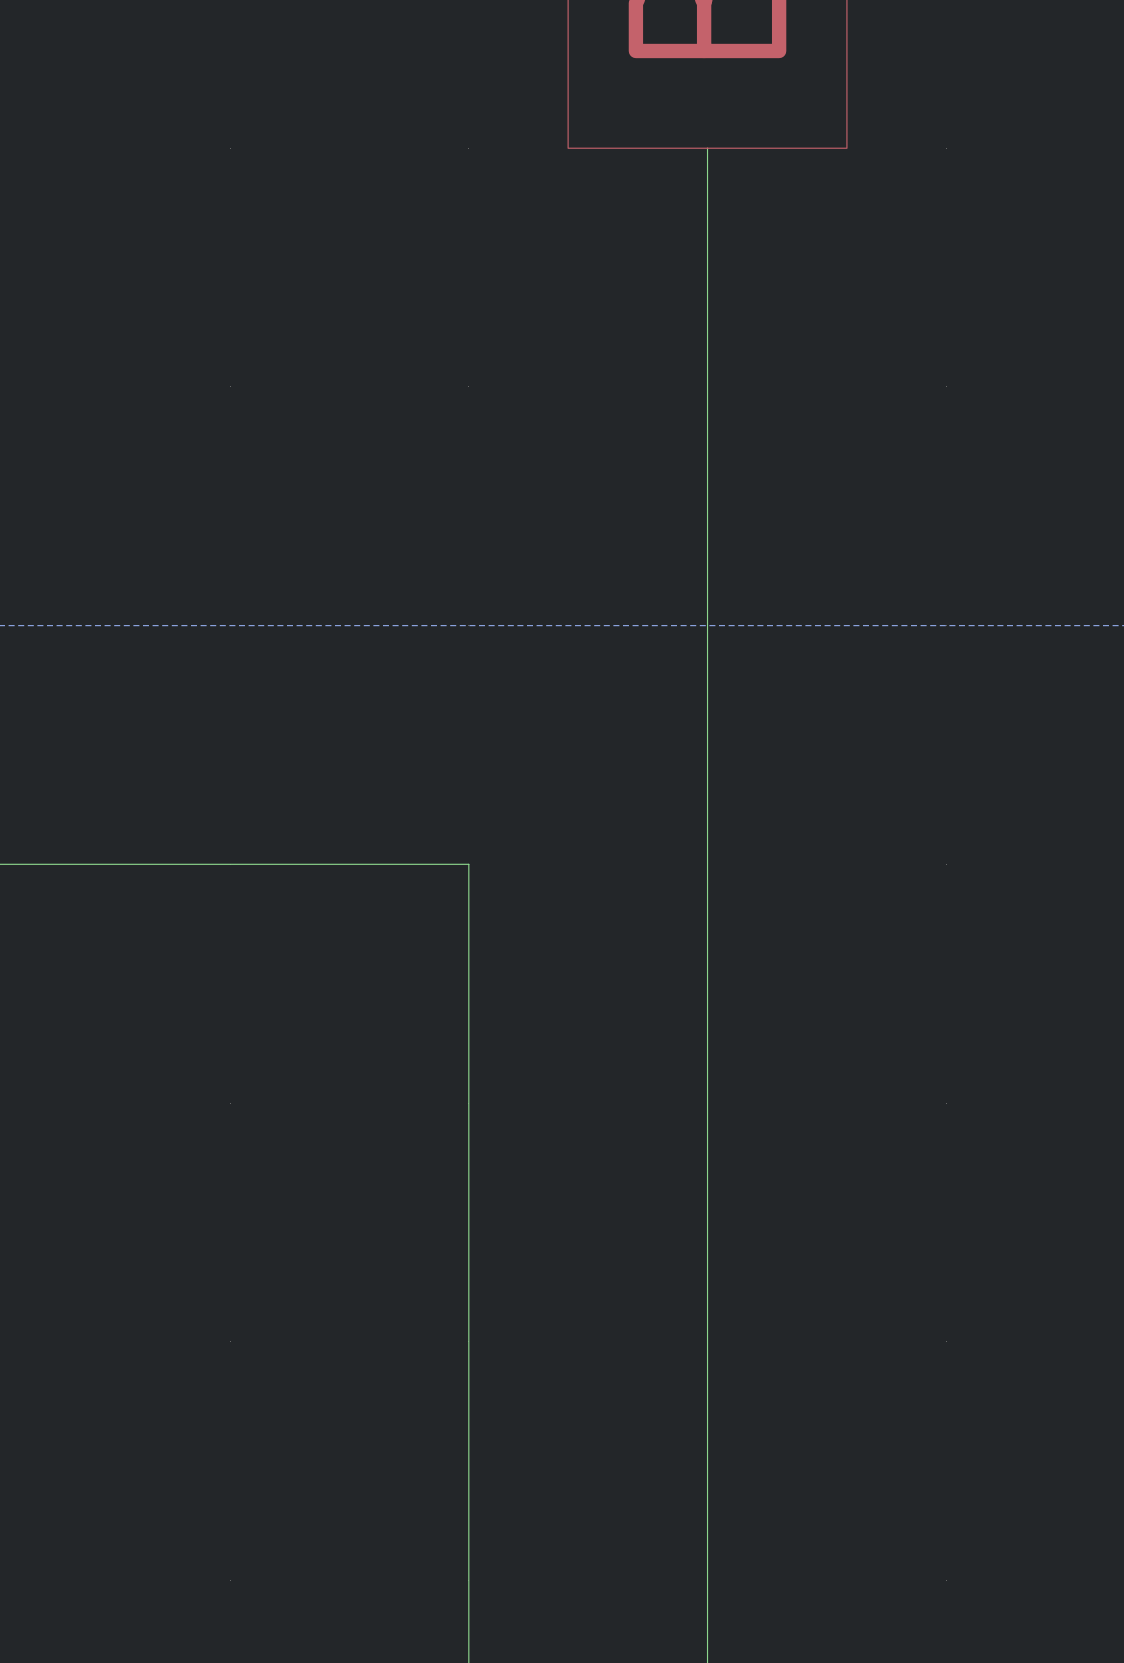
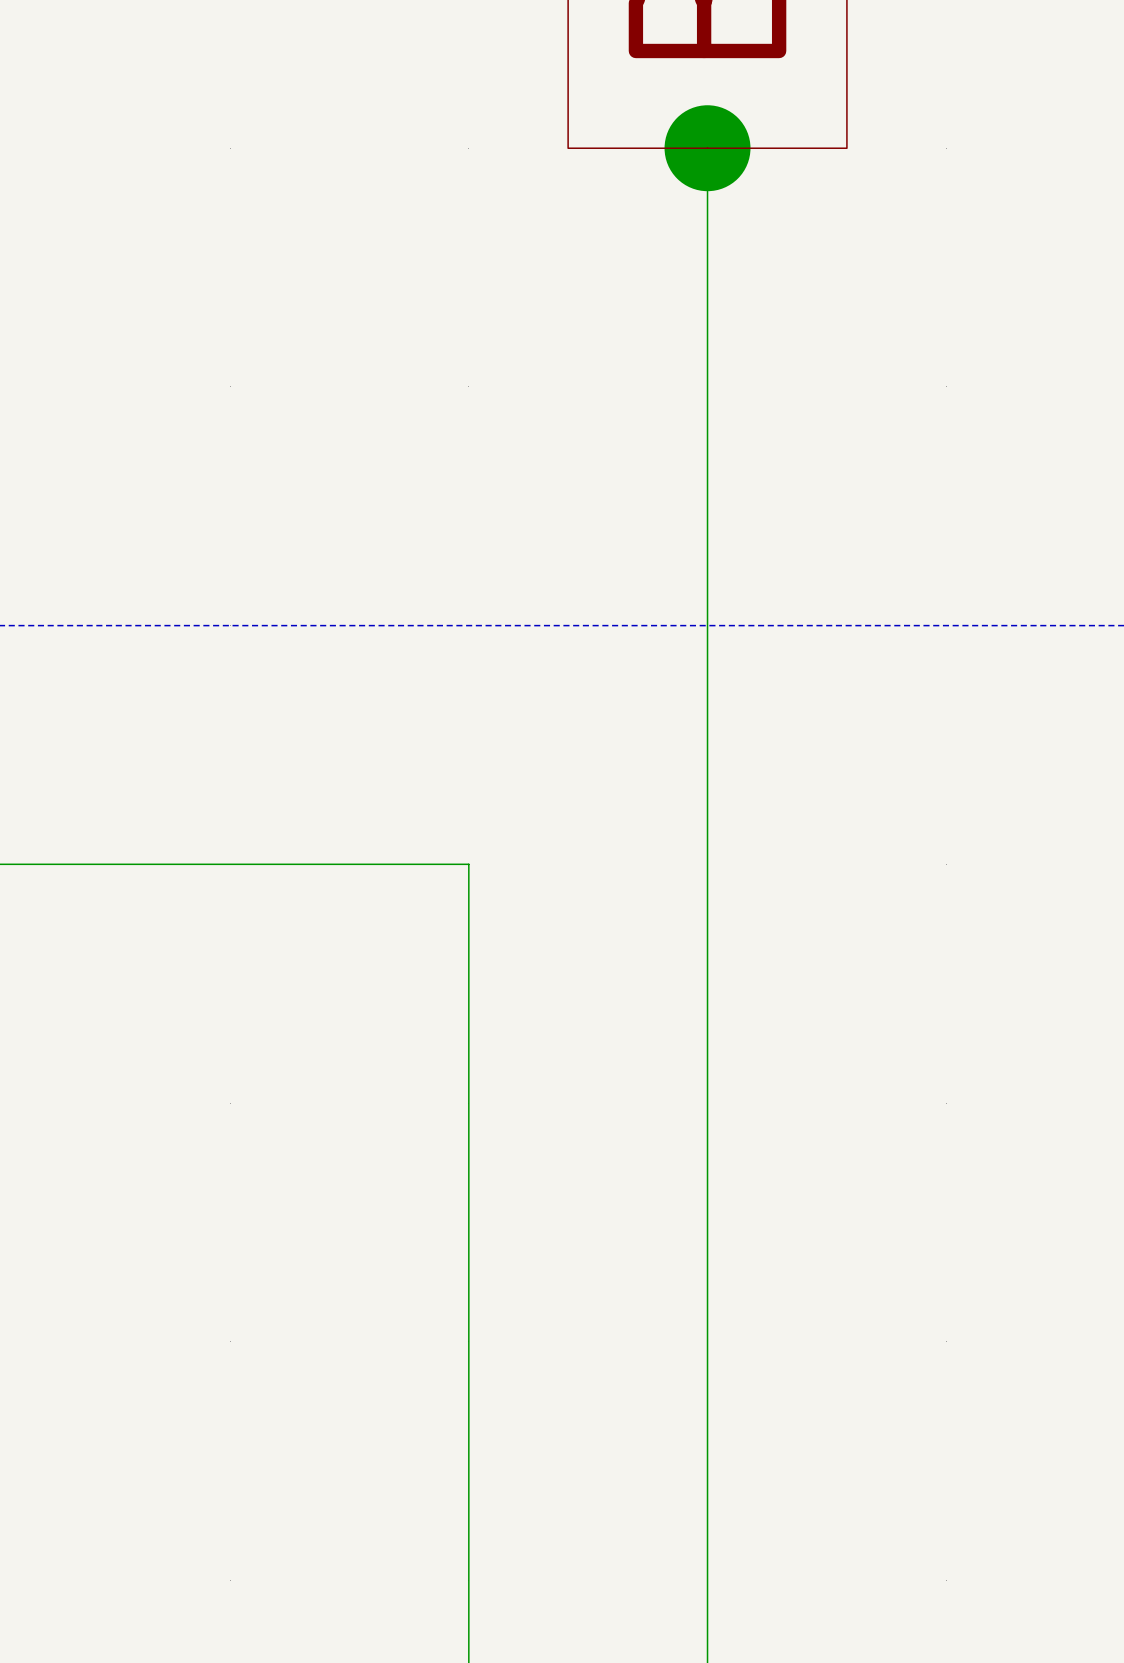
junction: none -> (707, 148)

